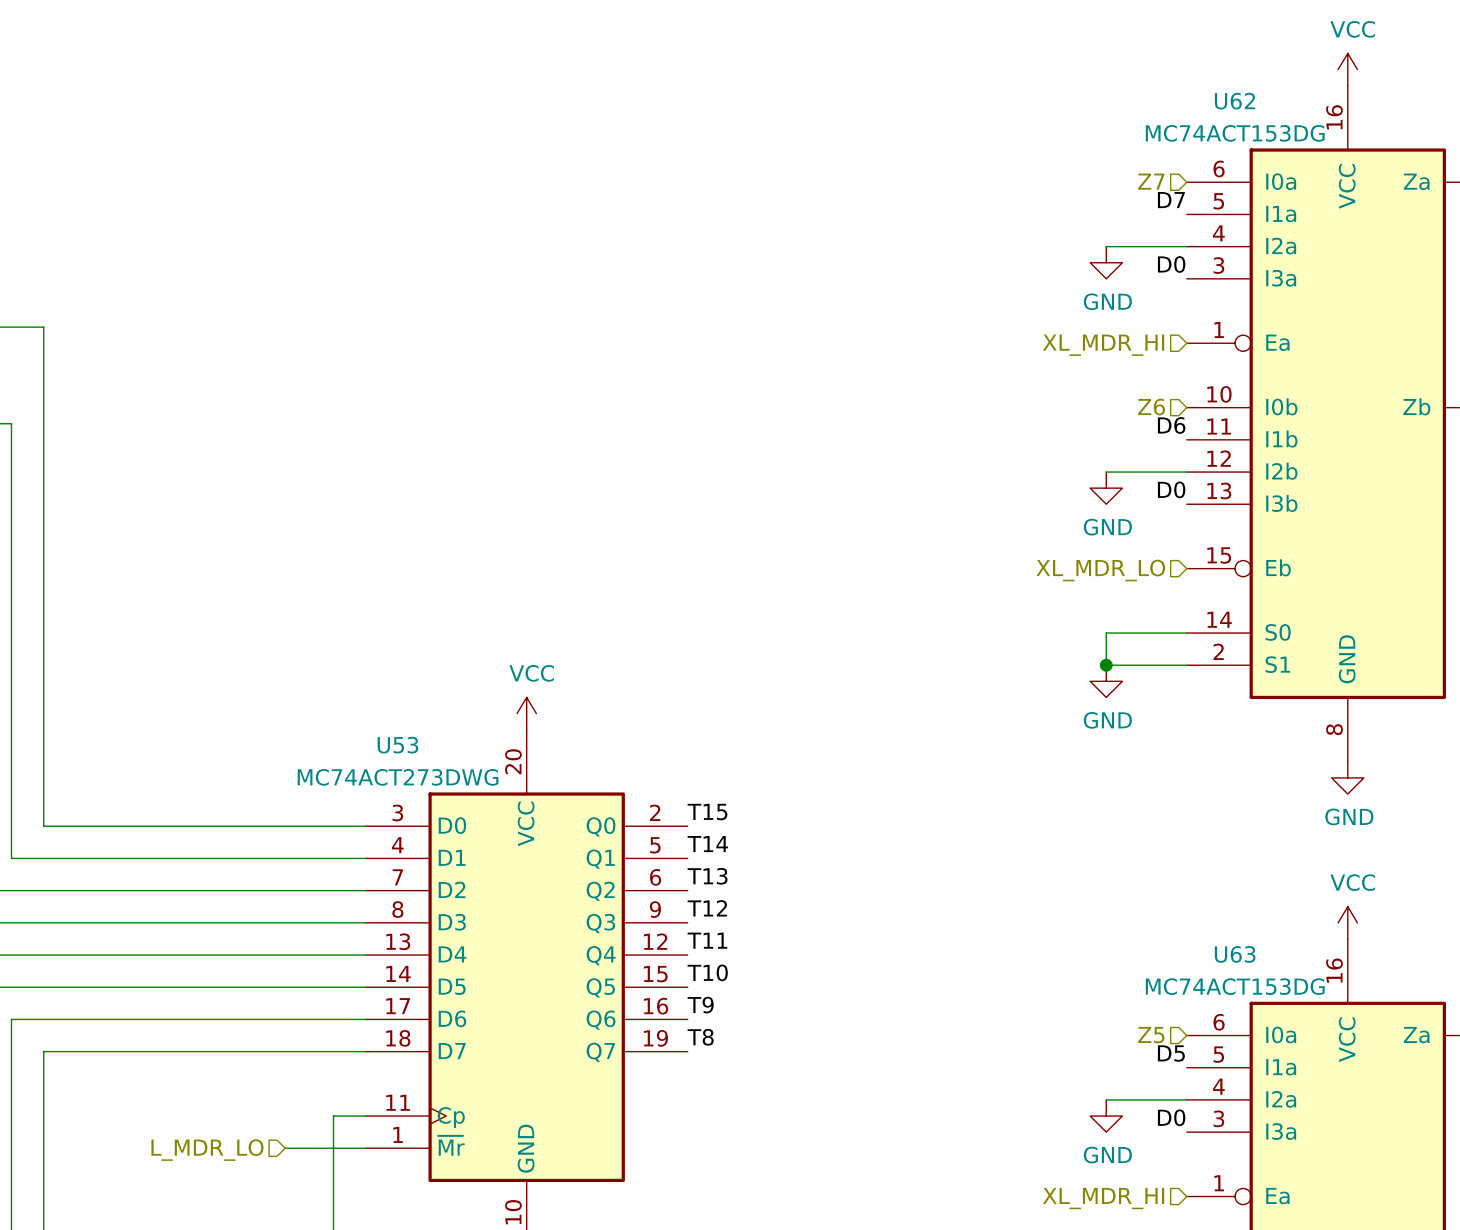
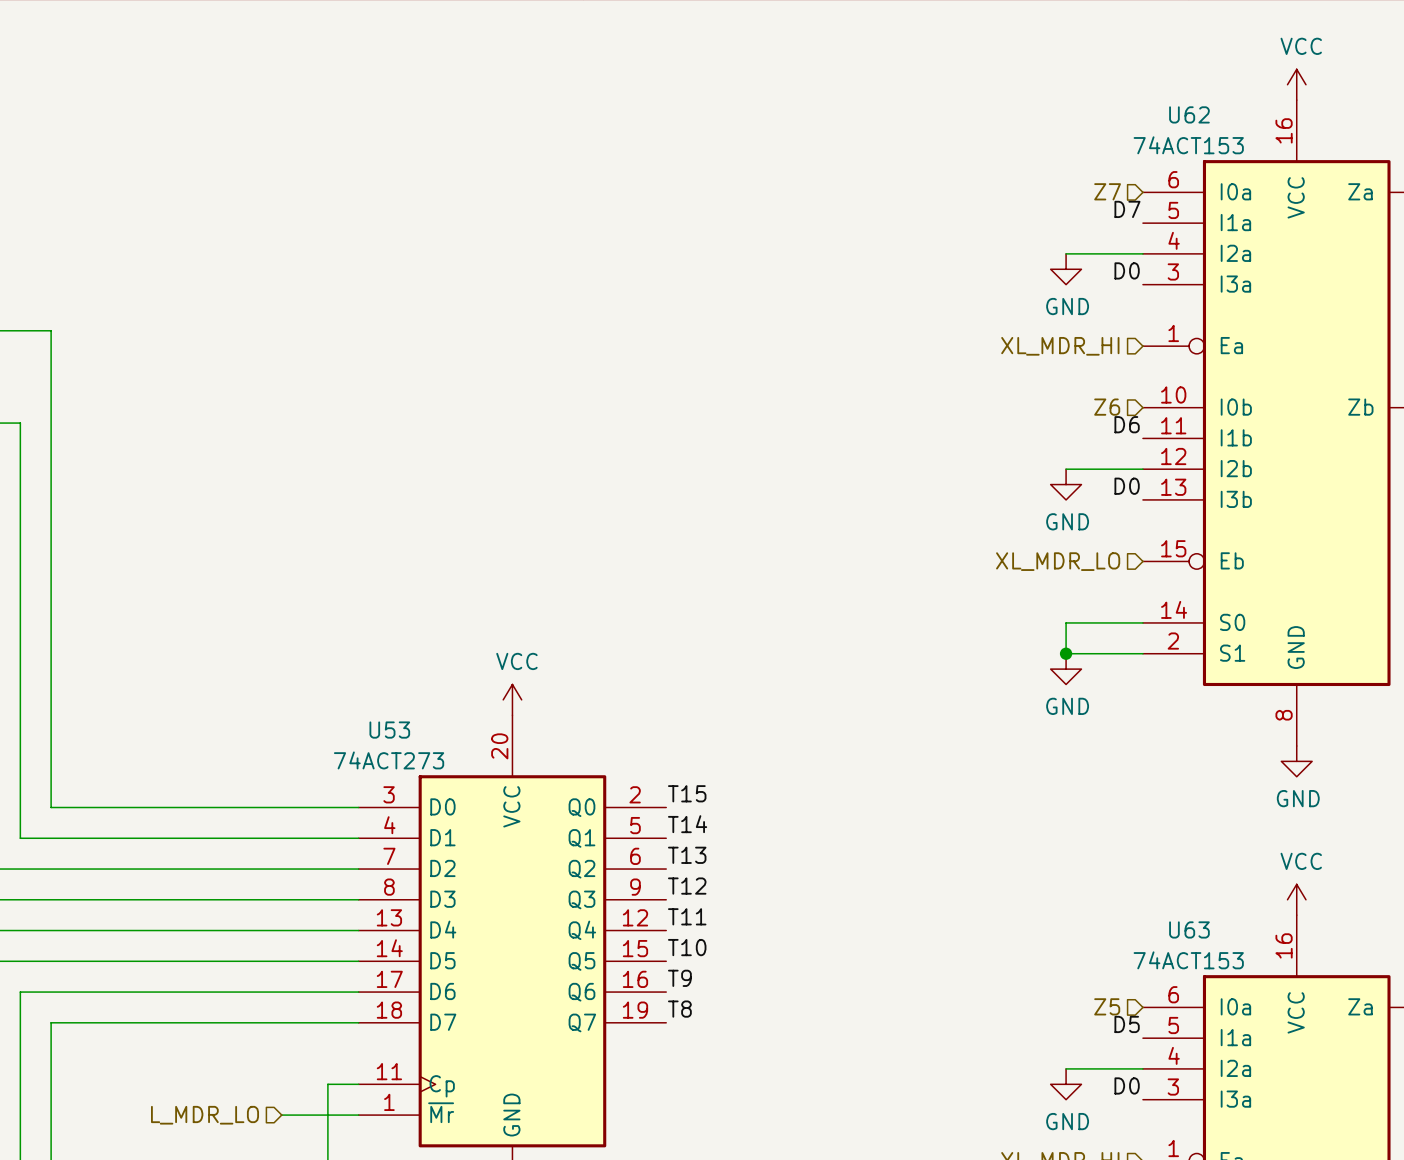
U62 value: MC74ACT153DG (1235, 133) -> 74ACT153 (1188, 145)
U53 value: MC74ACT273DWG (398, 777) -> 74ACT273 (389, 760)
U63 value: MC74ACT153DG (1235, 986) -> 74ACT153 (1188, 960)

